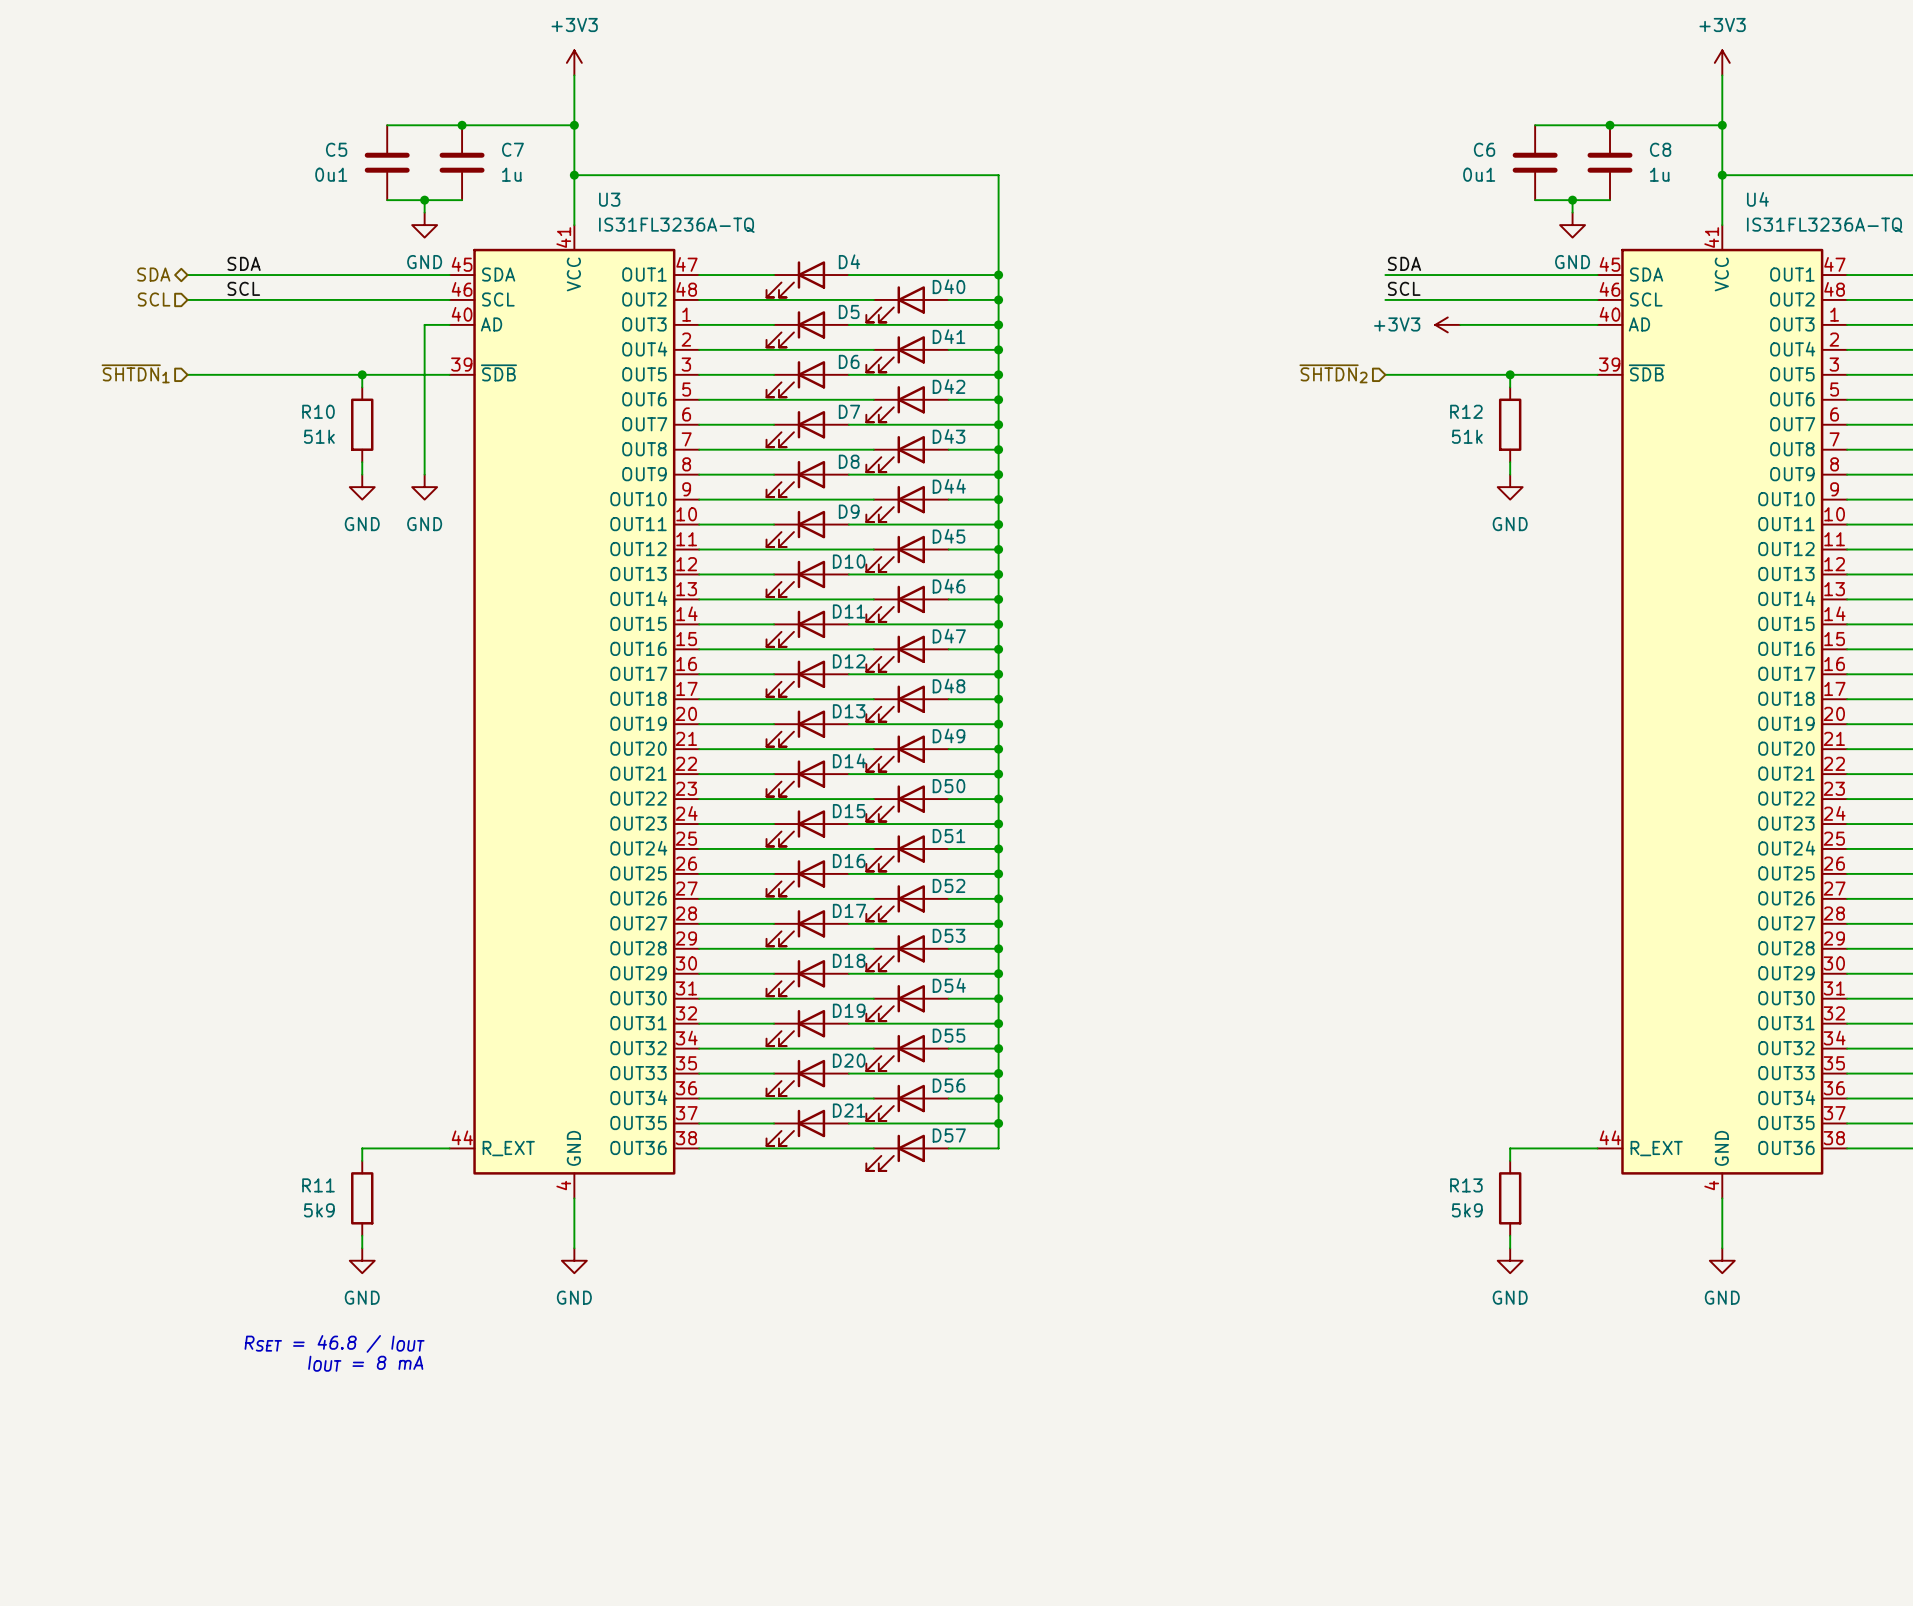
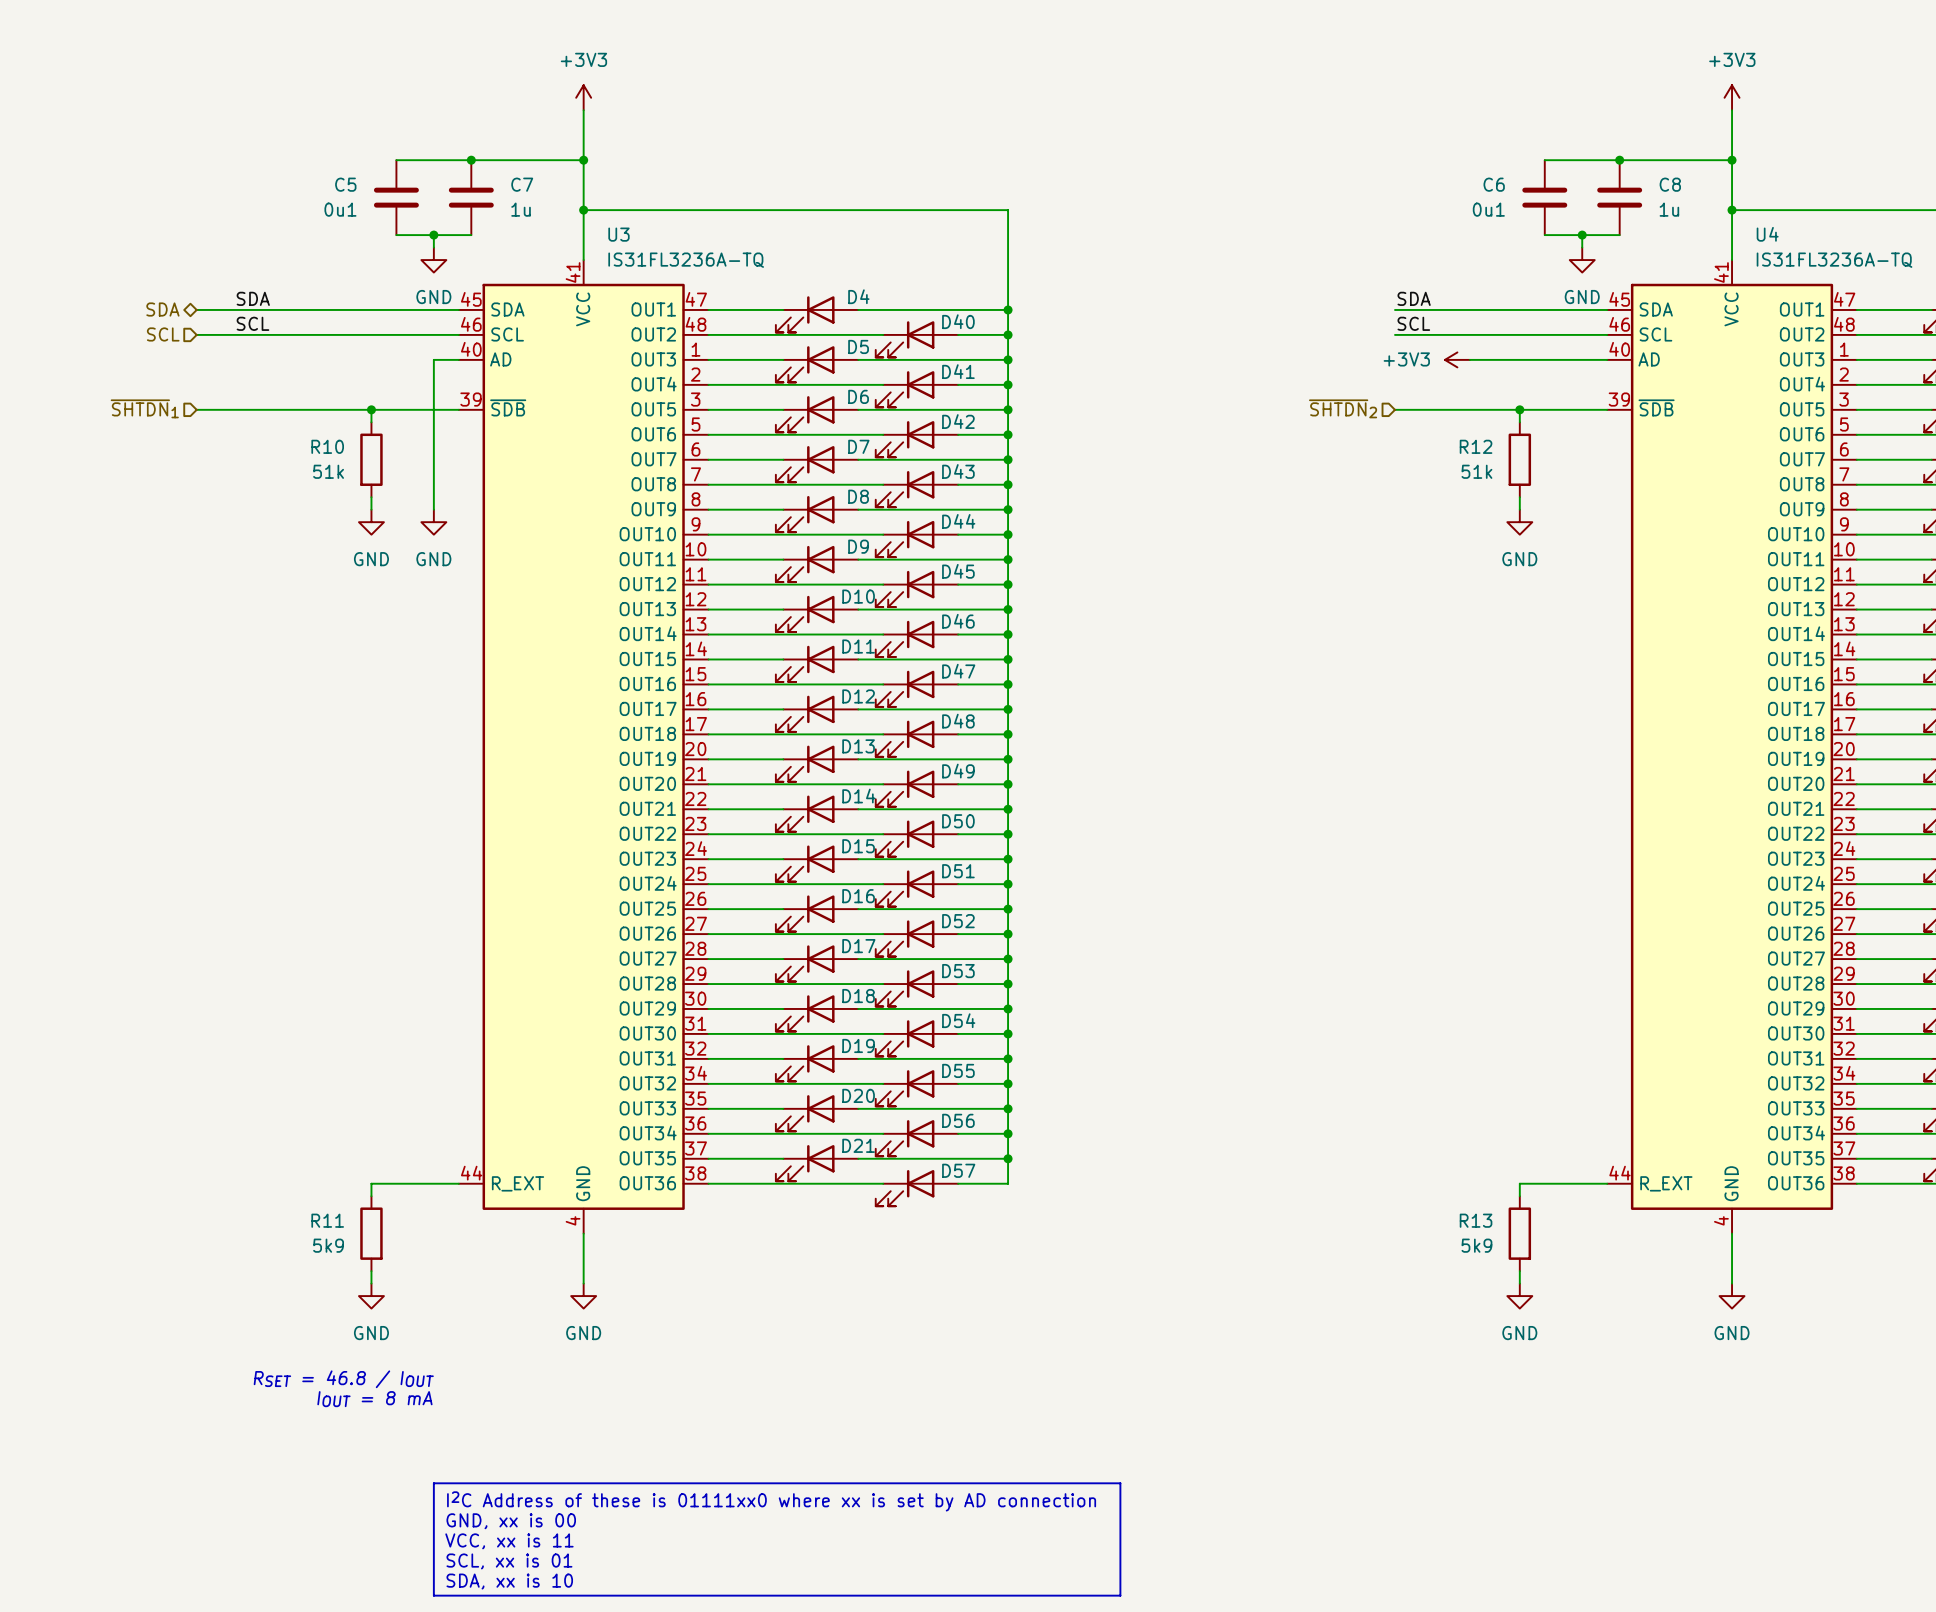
line: none -> (433, 1483) (1120, 1483) (1120, 1595) (433, 1595) (433, 1483)
text: none -> I2C Address of these is 01111xx0 where xx is set by AD connection (771, 1501)
text: none -> GND, xx is 00 (511, 1521)
text: none -> VCC, xx is 11 (509, 1541)
text: none -> SCL, xx is 01 (509, 1561)
text: none -> SDA, xx is 10 (509, 1581)

